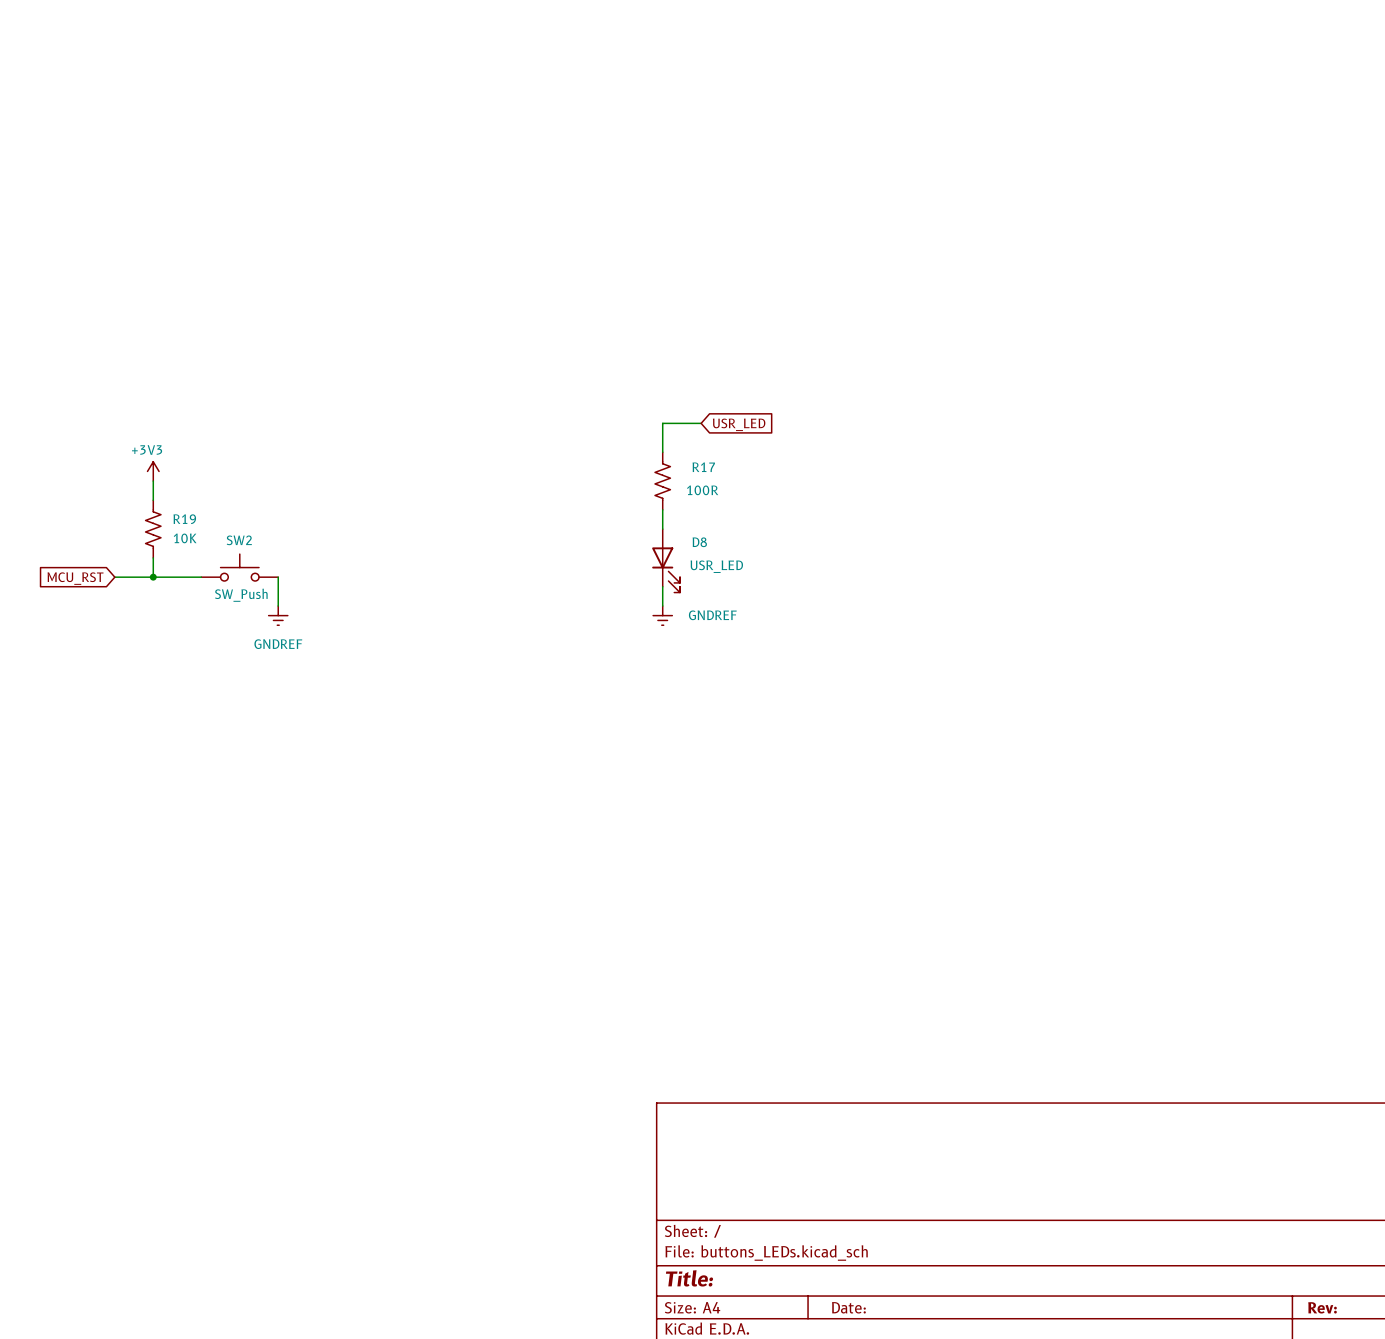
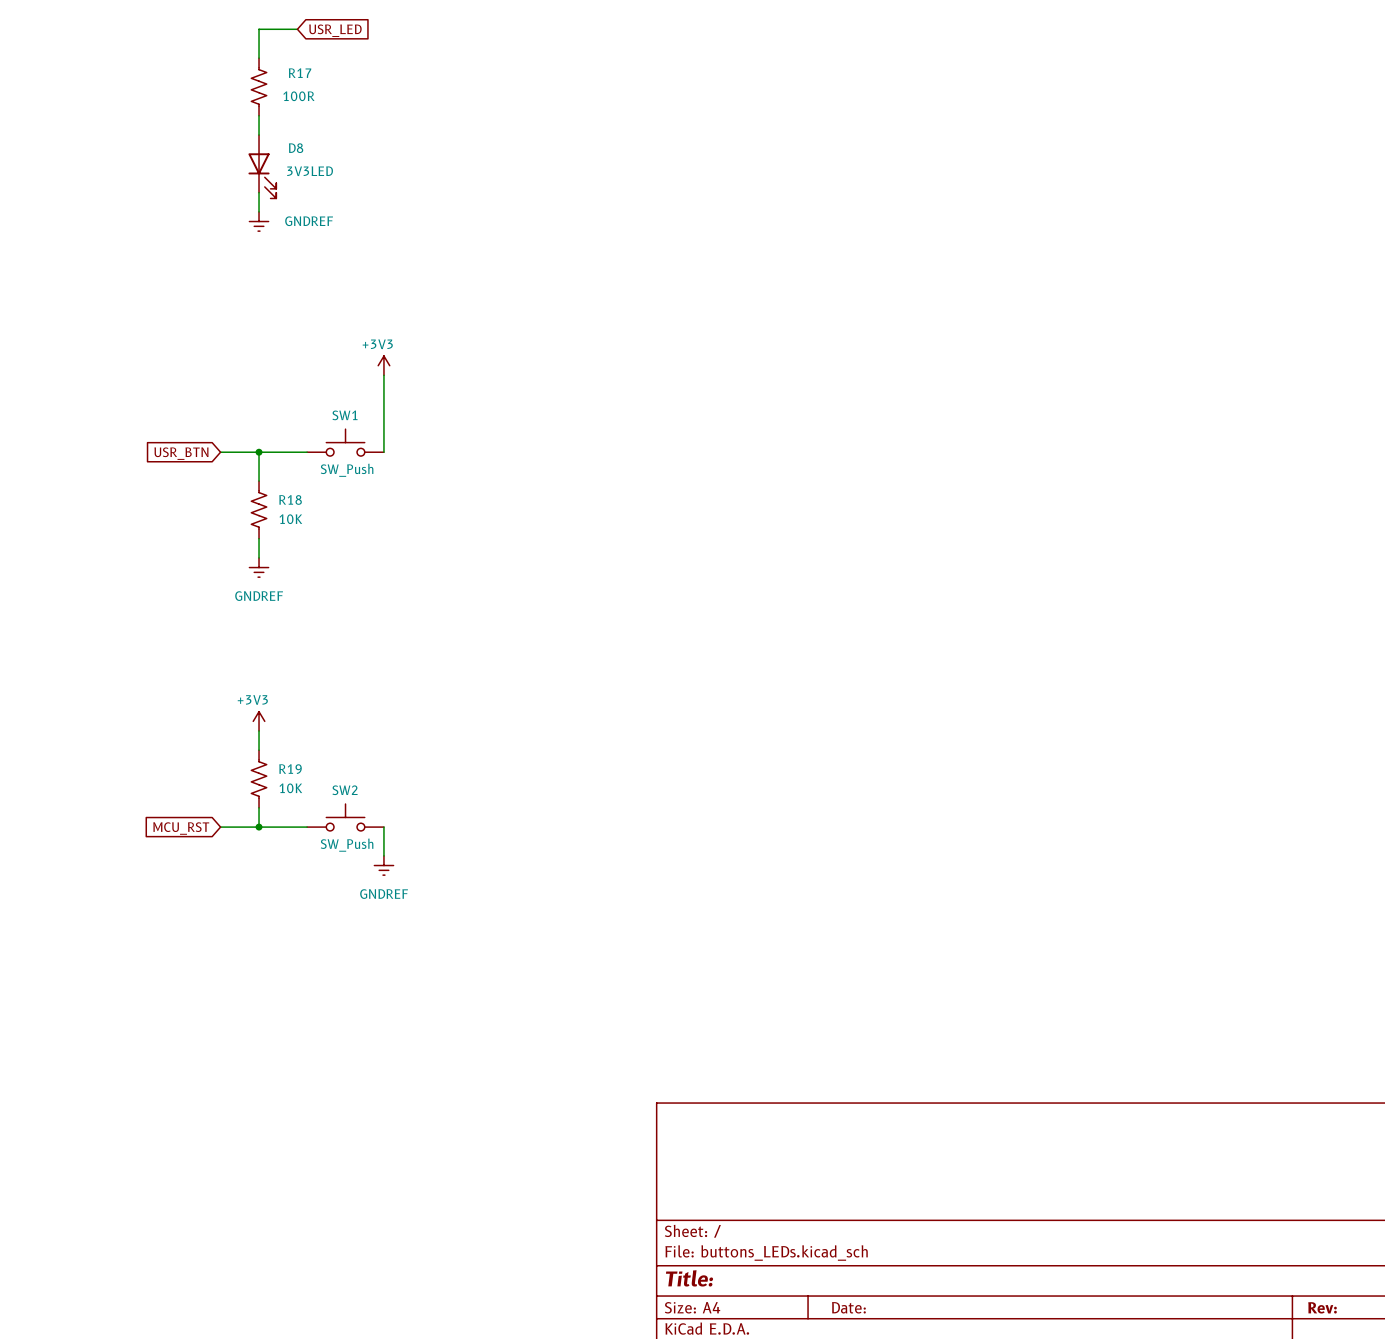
wire: none -> (297, 29) (259, 29) (259, 58)
global label: none -> USR_LED (335, 30)
wire: none -> (259, 115) (259, 135)
wire: none -> (259, 192) (259, 211)
power symbol: none -> GNDREF (259, 221)
power symbol: none -> +3V3 (383, 365)
wire: none -> (383, 375) (383, 452)
wire: (701, 423) (662, 423) (662, 452) -> none
global label: USR_LED (739, 424) -> none
SW1: none -> SW_Push (345, 442)
junction: none -> (259, 452)
global label: none -> USR_BTN (181, 453)
power symbol: +3V3 (153, 471) -> none
wire: (153, 481) (153, 500) -> none
R17 position: (662, 481) -> (259, 86)
R18: none -> 10K (259, 509)
wire: (662, 509) (662, 529) -> none
R19 position: (153, 529) -> (259, 779)
wire: (153, 557) (153, 577) -> (259, 538) (259, 557)
D8 position: (666, 560) -> (262, 166)
D8 value: USR_LED (716, 566) -> 3V3LED (310, 171)
SW2 position: (239, 567) -> (345, 817)
wire: (114, 577) (201, 577) -> (220, 452) (307, 452)
junction: (153, 577) -> none
wire: (278, 577) (278, 606) -> (259, 452) (259, 481)
global label: MCU_RST (75, 578) -> none
wire: (662, 586) (662, 606) -> none
power symbol position: GNDREF (278, 615) -> GNDREF (259, 567)
power symbol: GNDREF (662, 615) -> none
power symbol: none -> +3V3 (259, 721)
wire: none -> (259, 730) (259, 750)
wire: none -> (259, 807) (259, 827)
wire: none -> (220, 827) (307, 827)
junction: none -> (259, 827)
wire: none -> (383, 827) (383, 855)
global label: none -> MCU_RST (181, 828)
power symbol: none -> GNDREF (383, 865)

